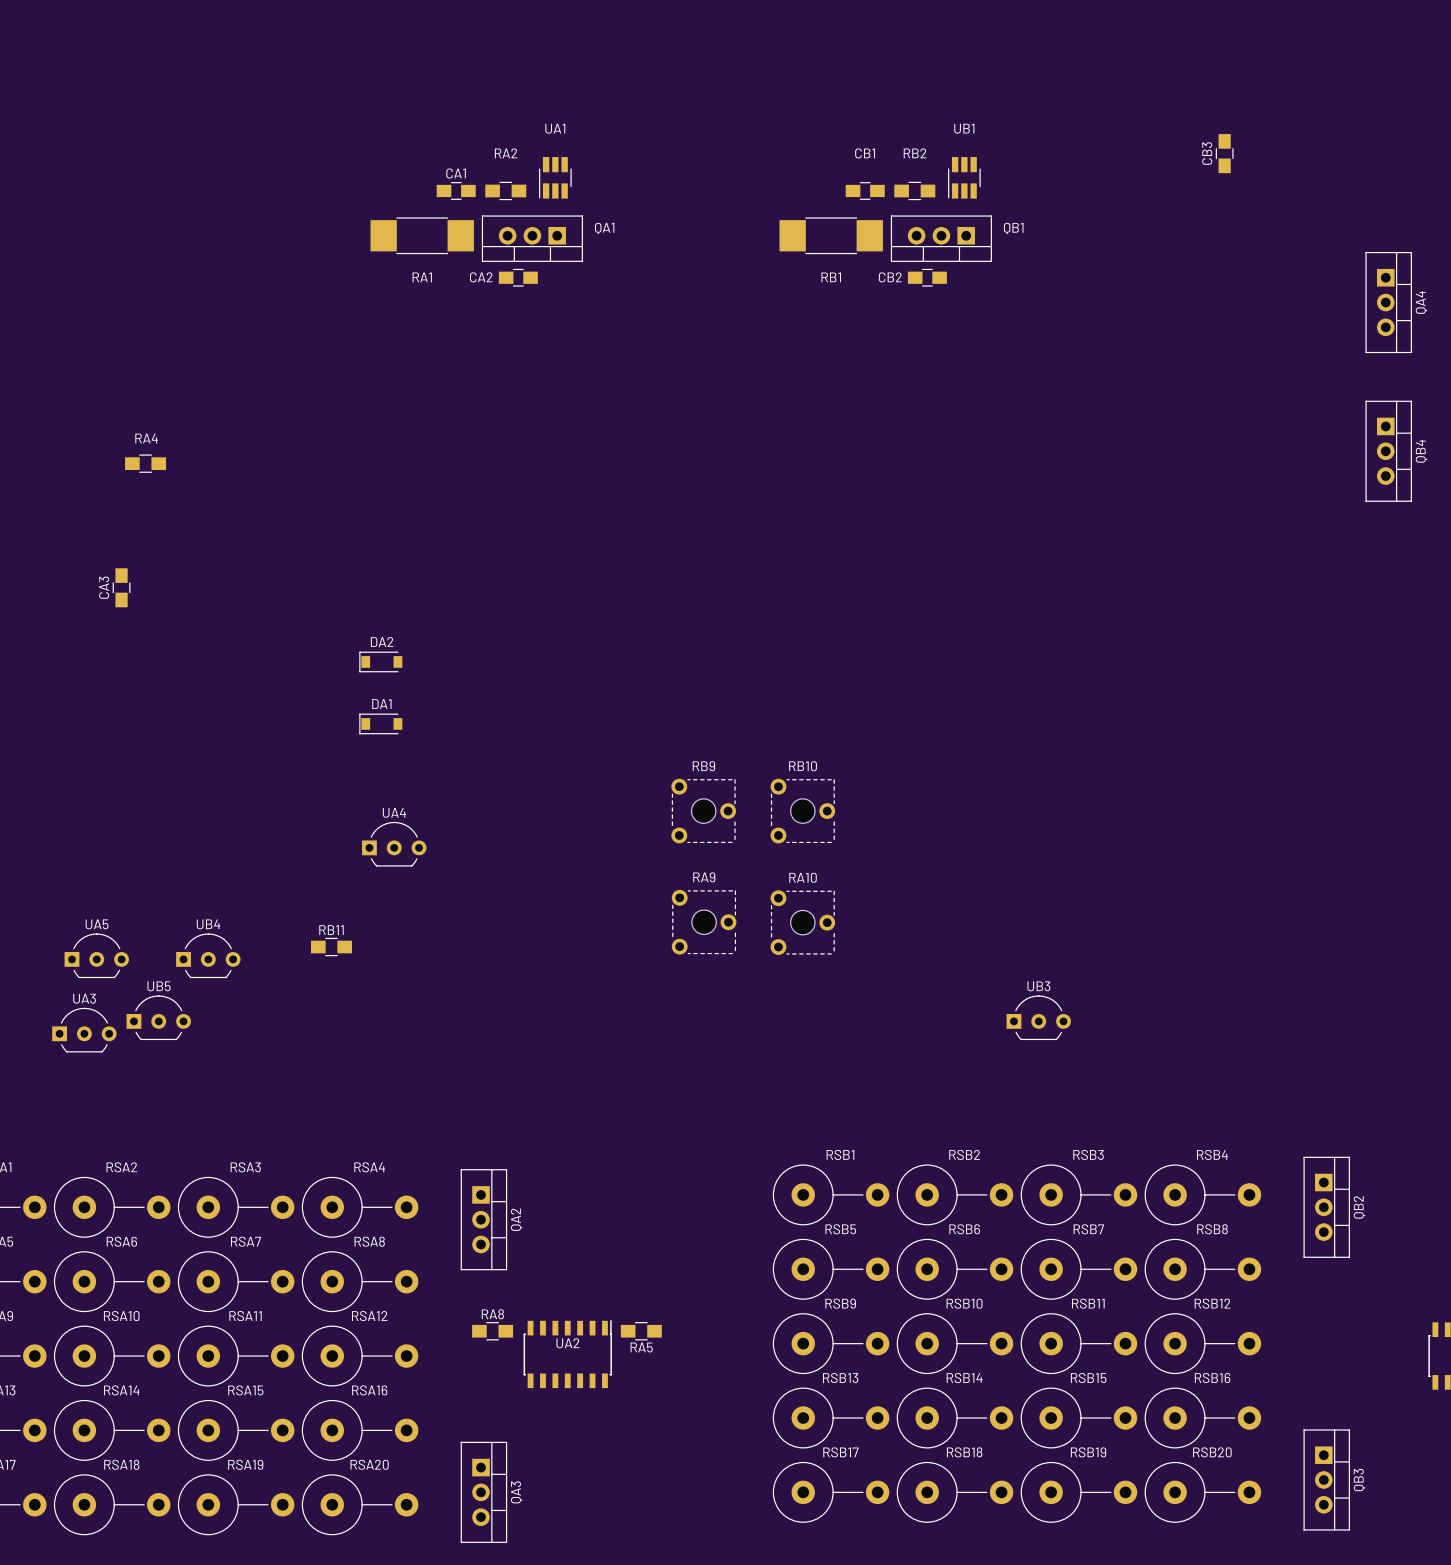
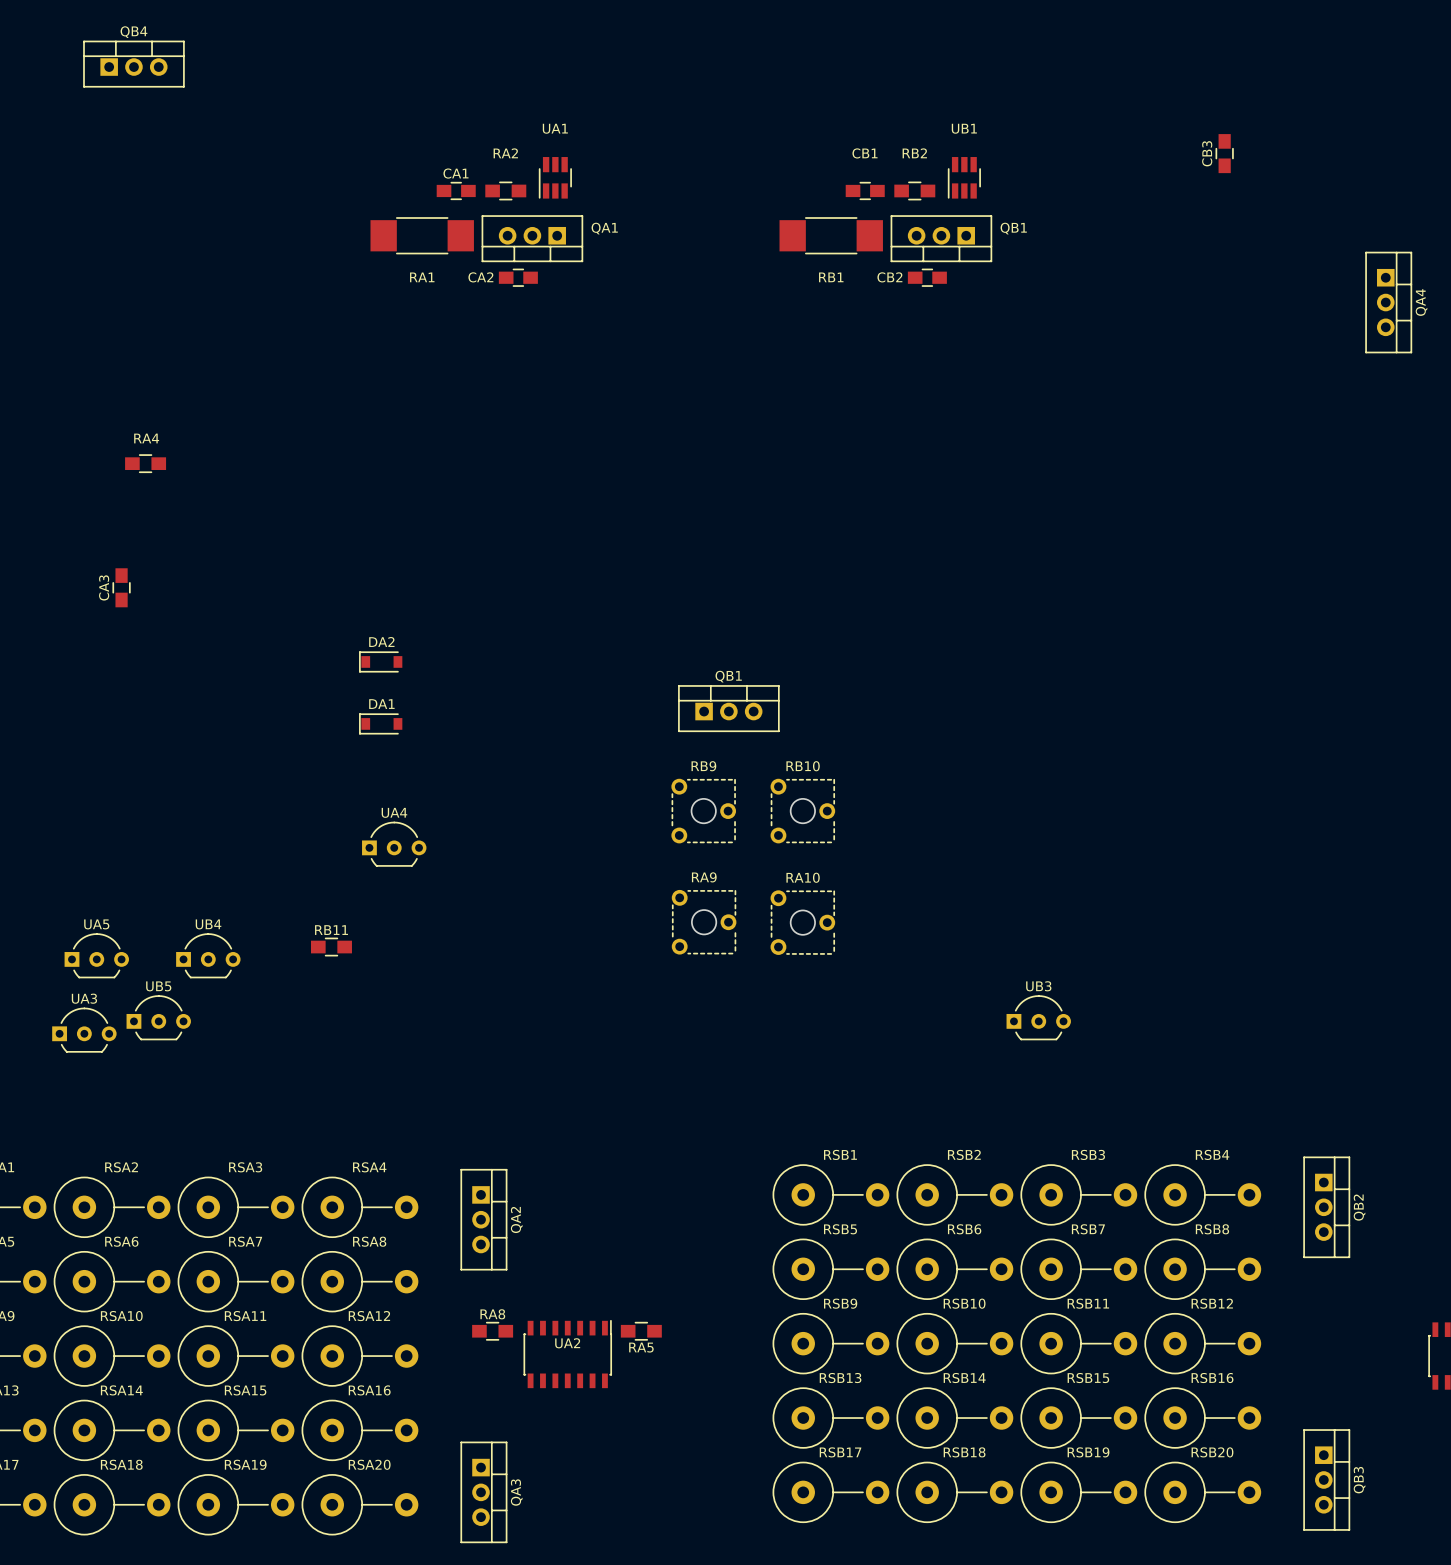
QB4 rotation: 0° (1388, 451) -> 90° counterclockwise (133, 64)
QB4 position: (1388, 451) -> (133, 64)
QB1: none -> (728, 708)

